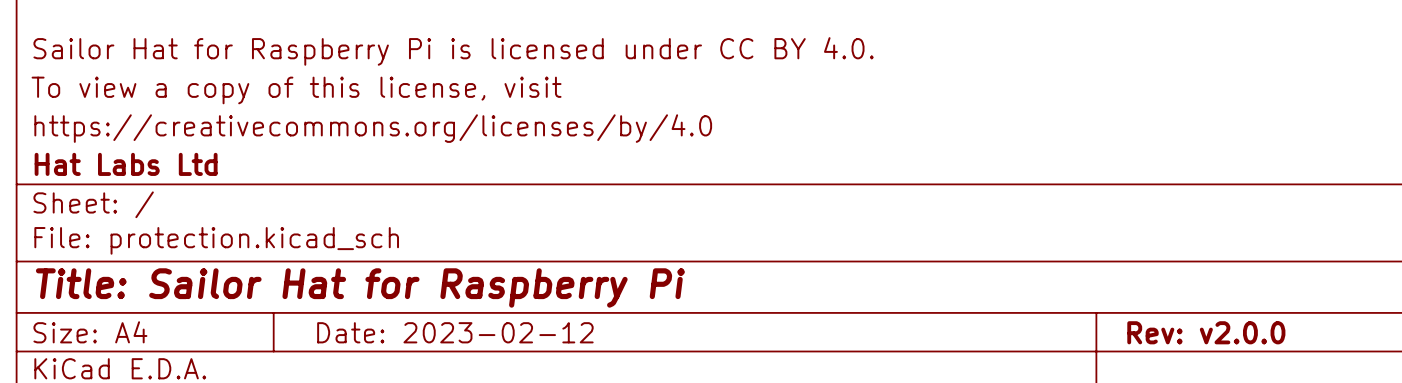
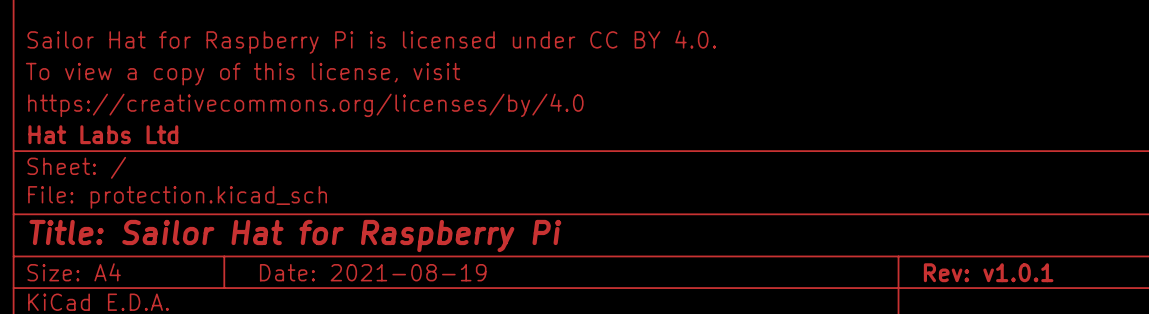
title block: Date: 2023-02-12 (455, 332) -> Date: 2021-08-19 (373, 272)
title block: Rev: v2.0.0 (1206, 332) -> Rev: v1.0.1 (988, 272)

